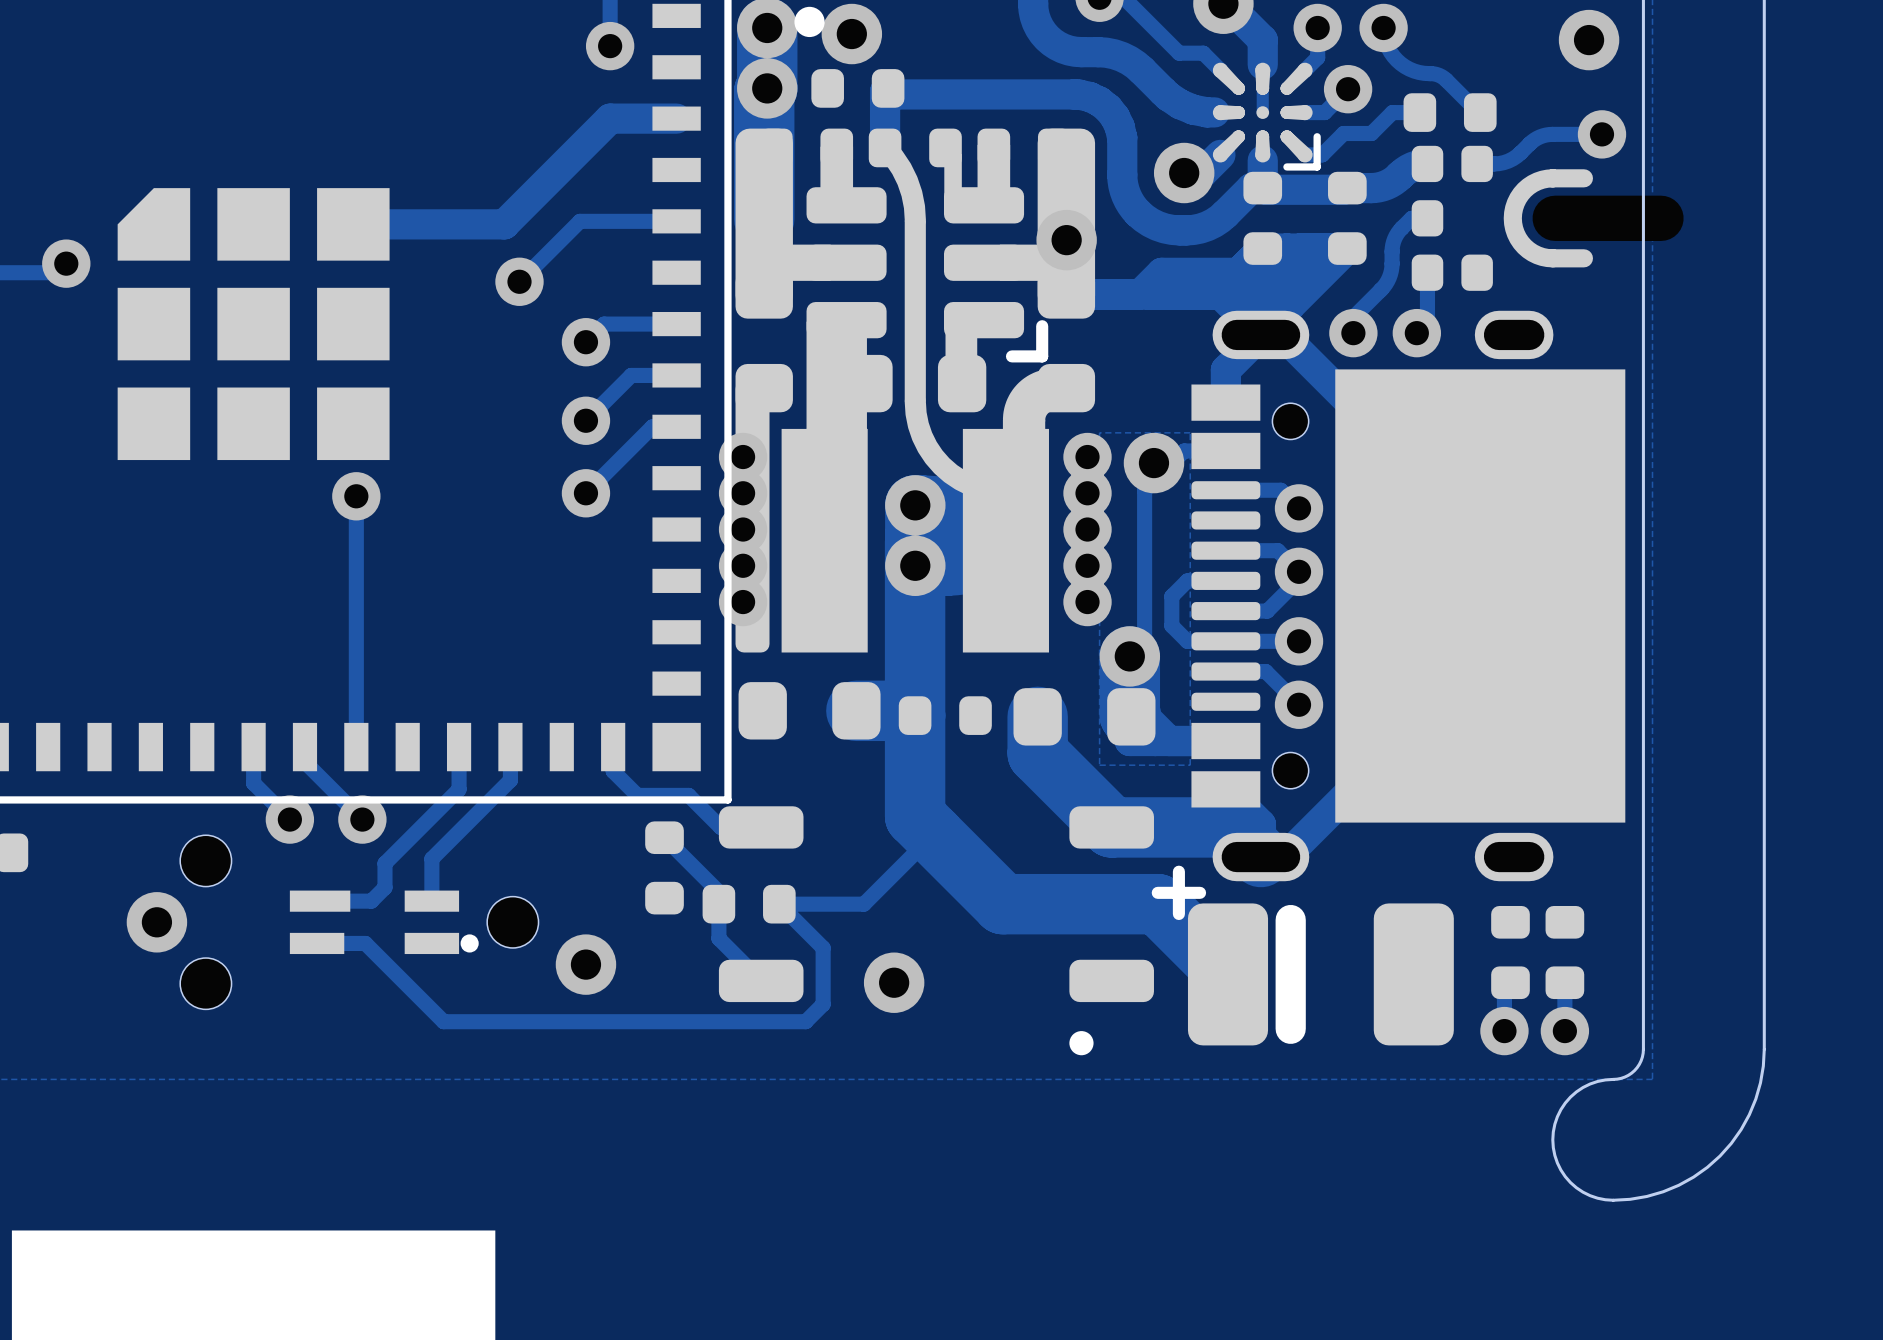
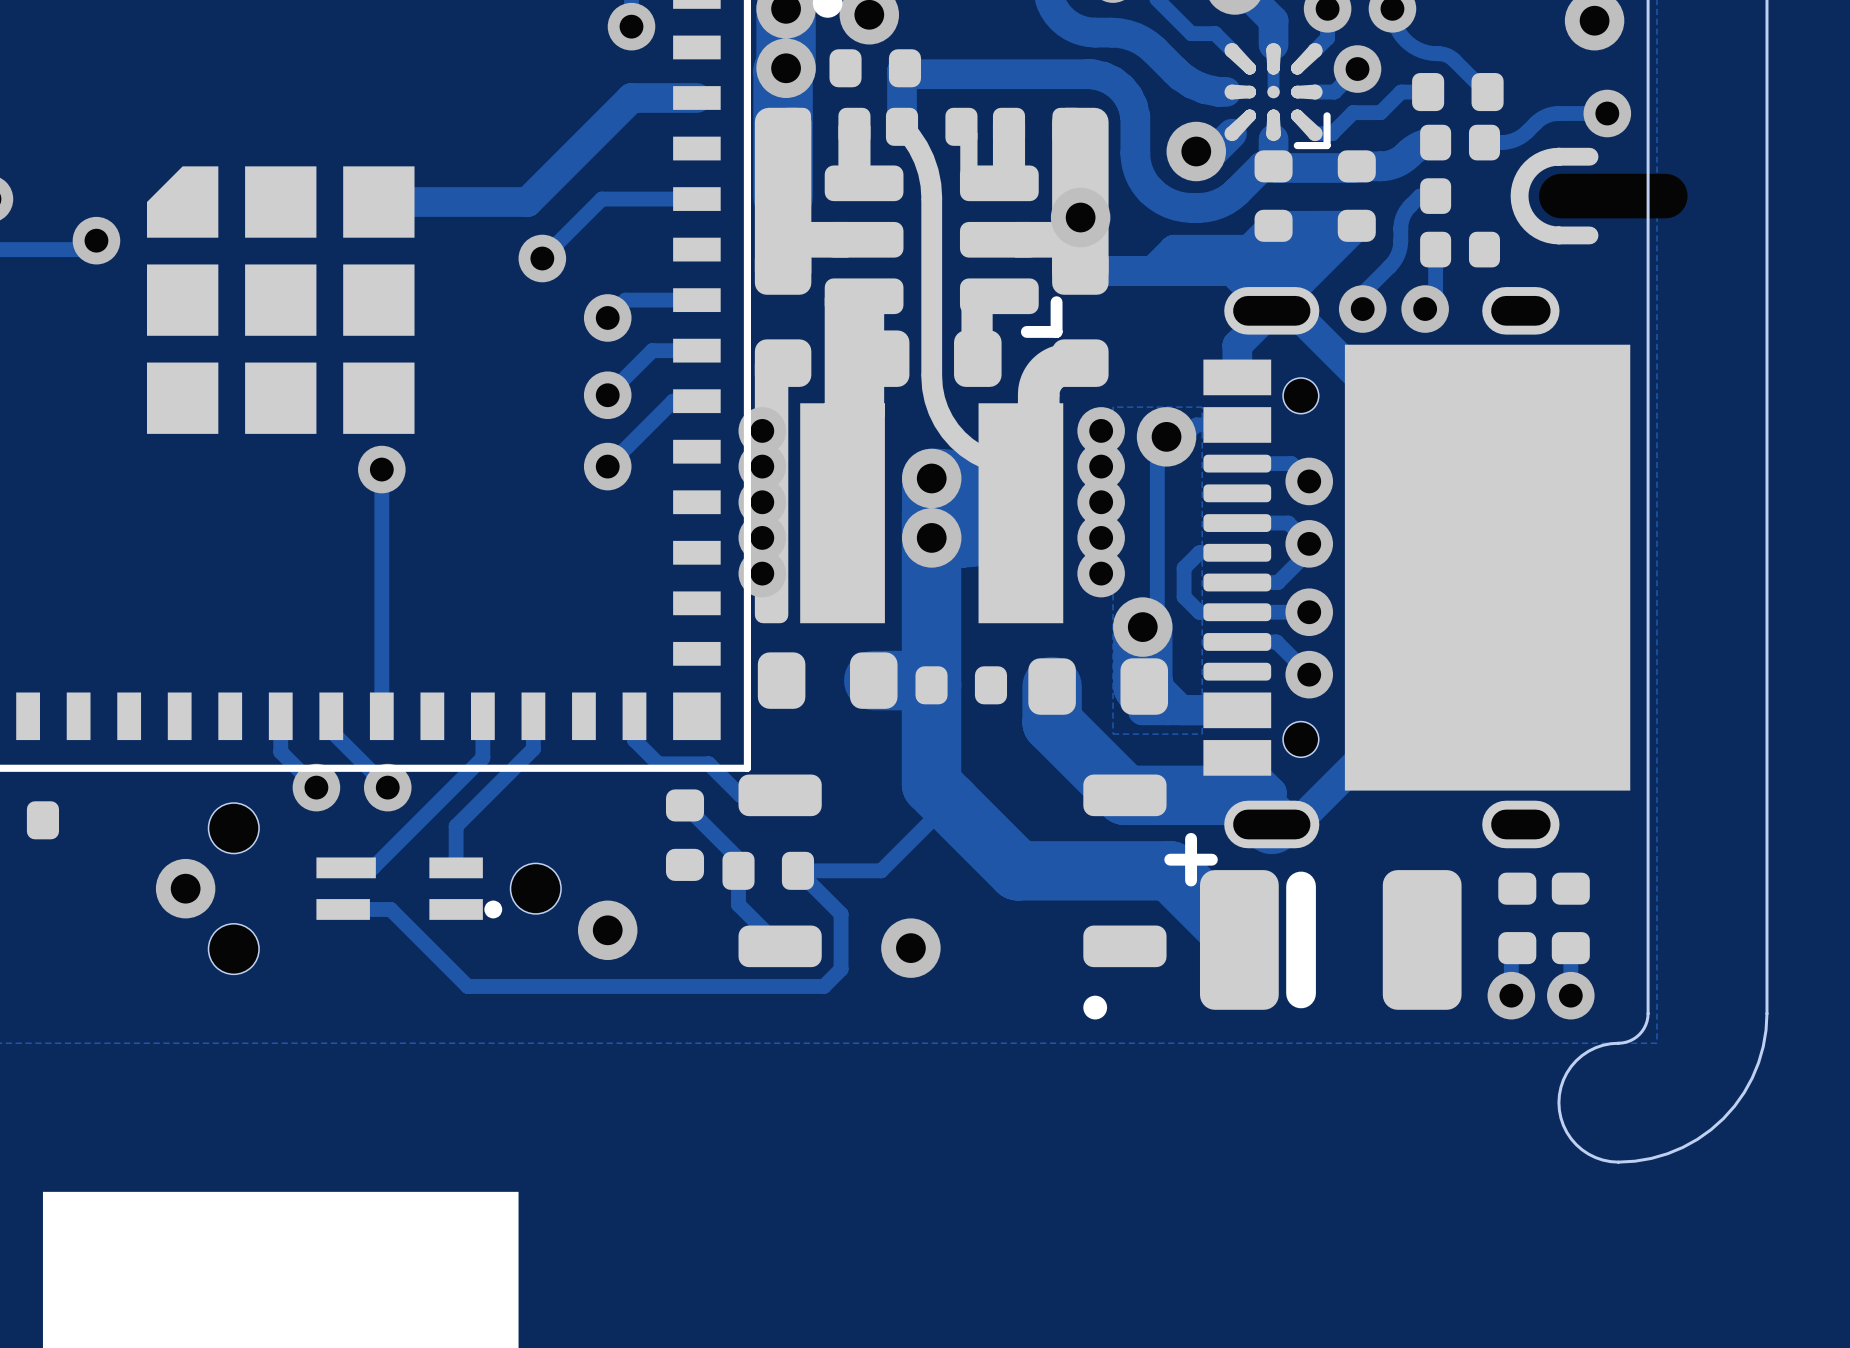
track: (384, 863) (384, 887) (371, 901) (347, 901) -> (409, 830) (372, 867)

